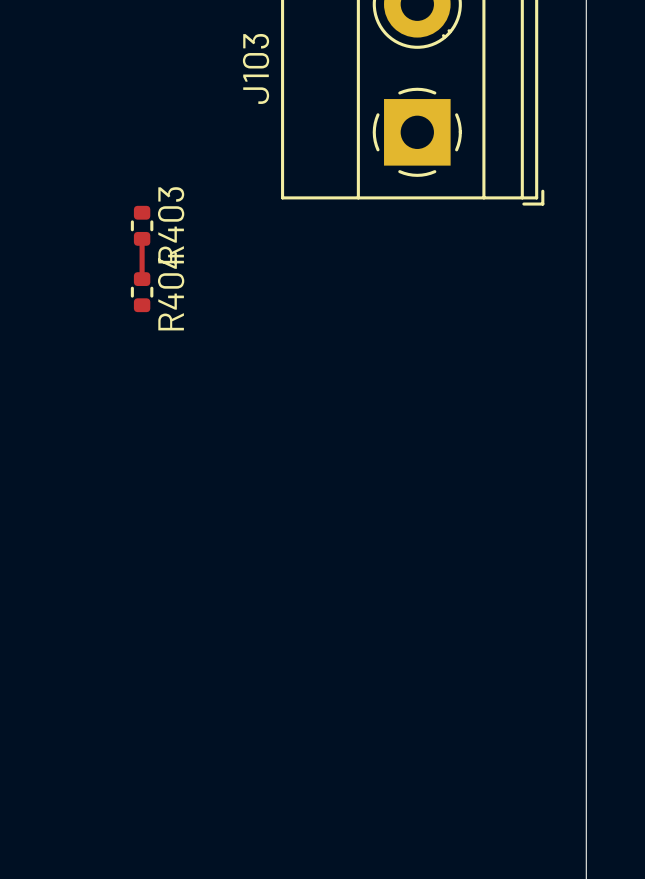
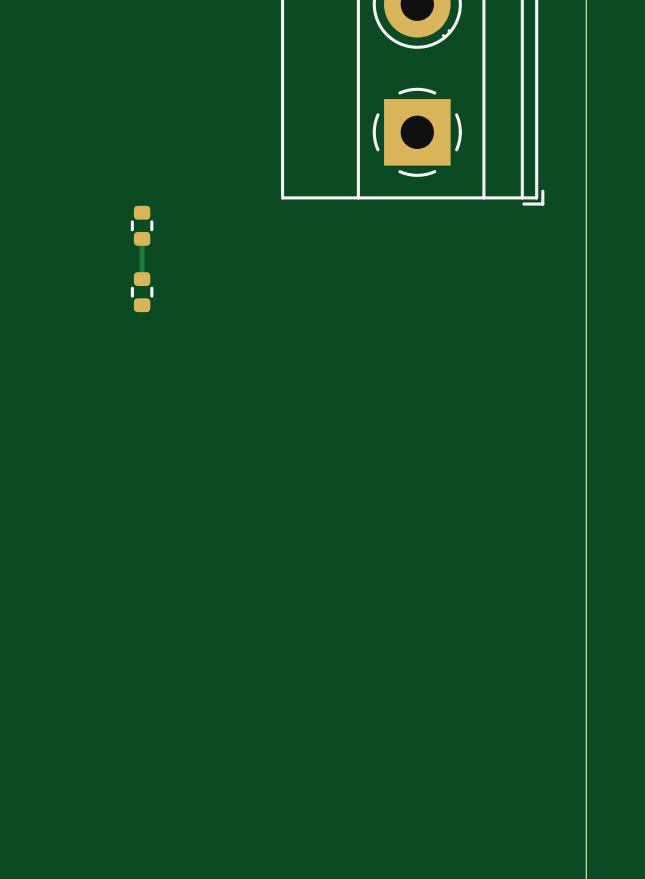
J103 name: J103 (256, 68) -> none
R403 name: R403 (171, 225) -> none
R404 name: R404 (171, 291) -> none

